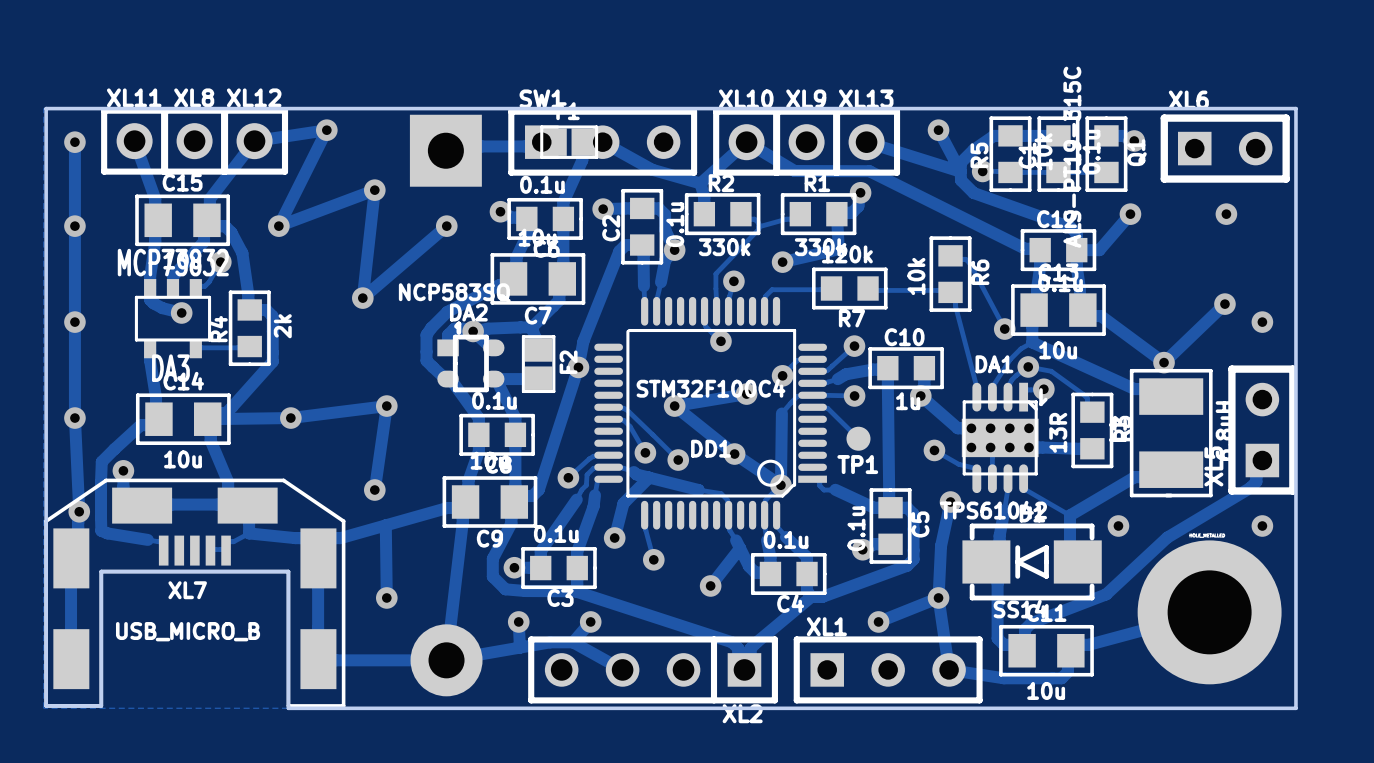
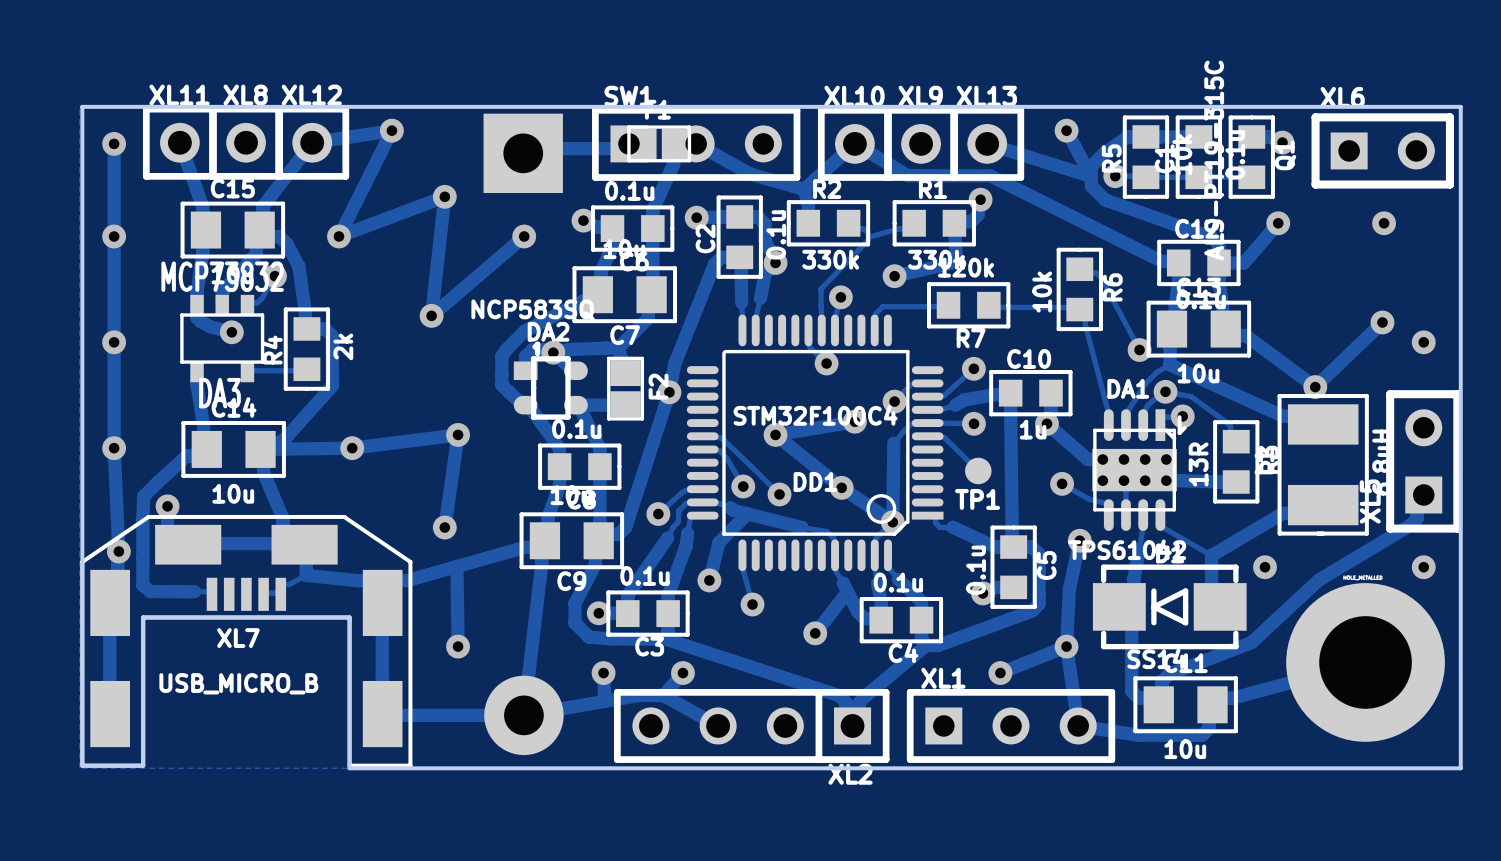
track: (101, 518) (101, 530) (107, 533) (160, 541) -> (142, 558) (142, 585) (150, 591) (211, 591) (209, 584)

